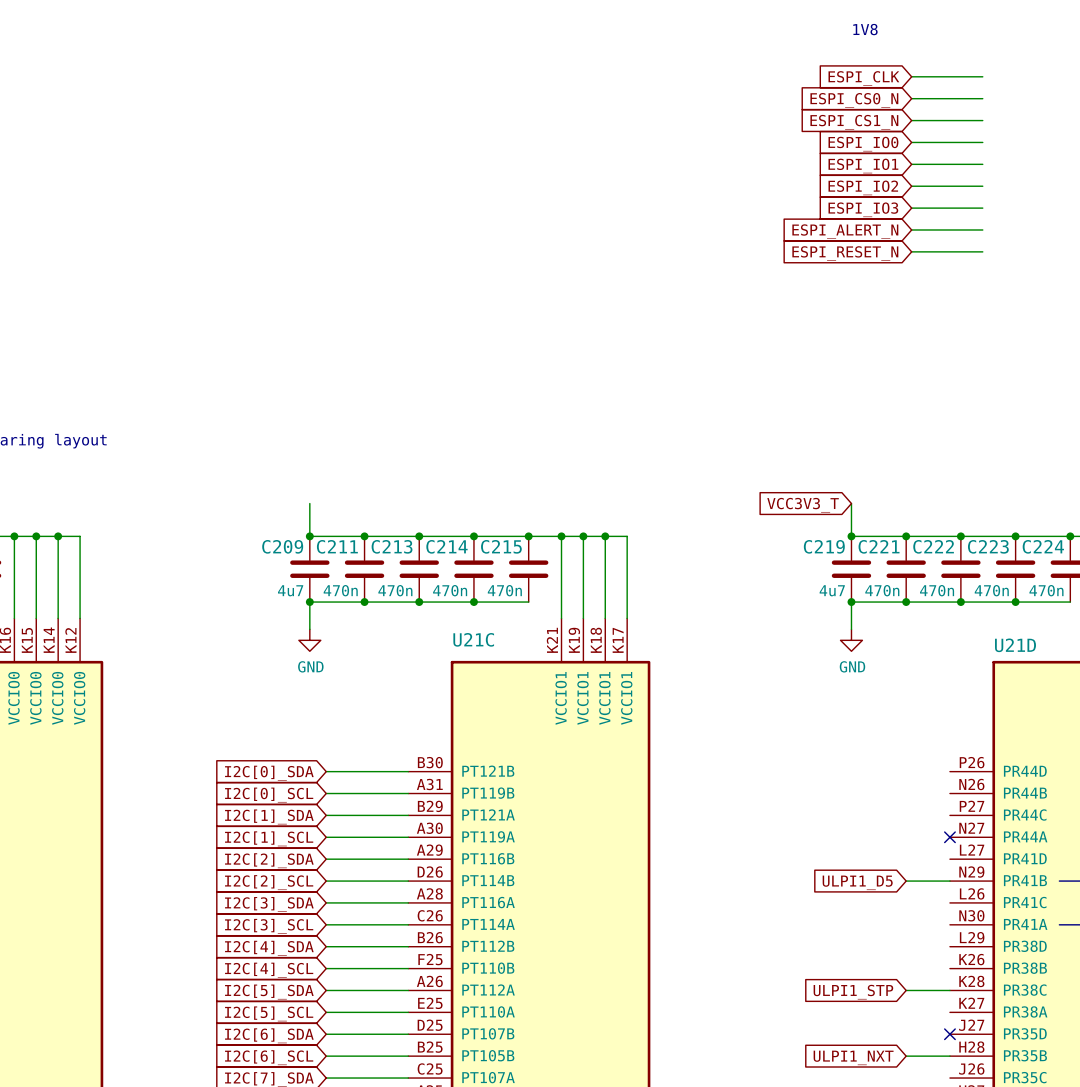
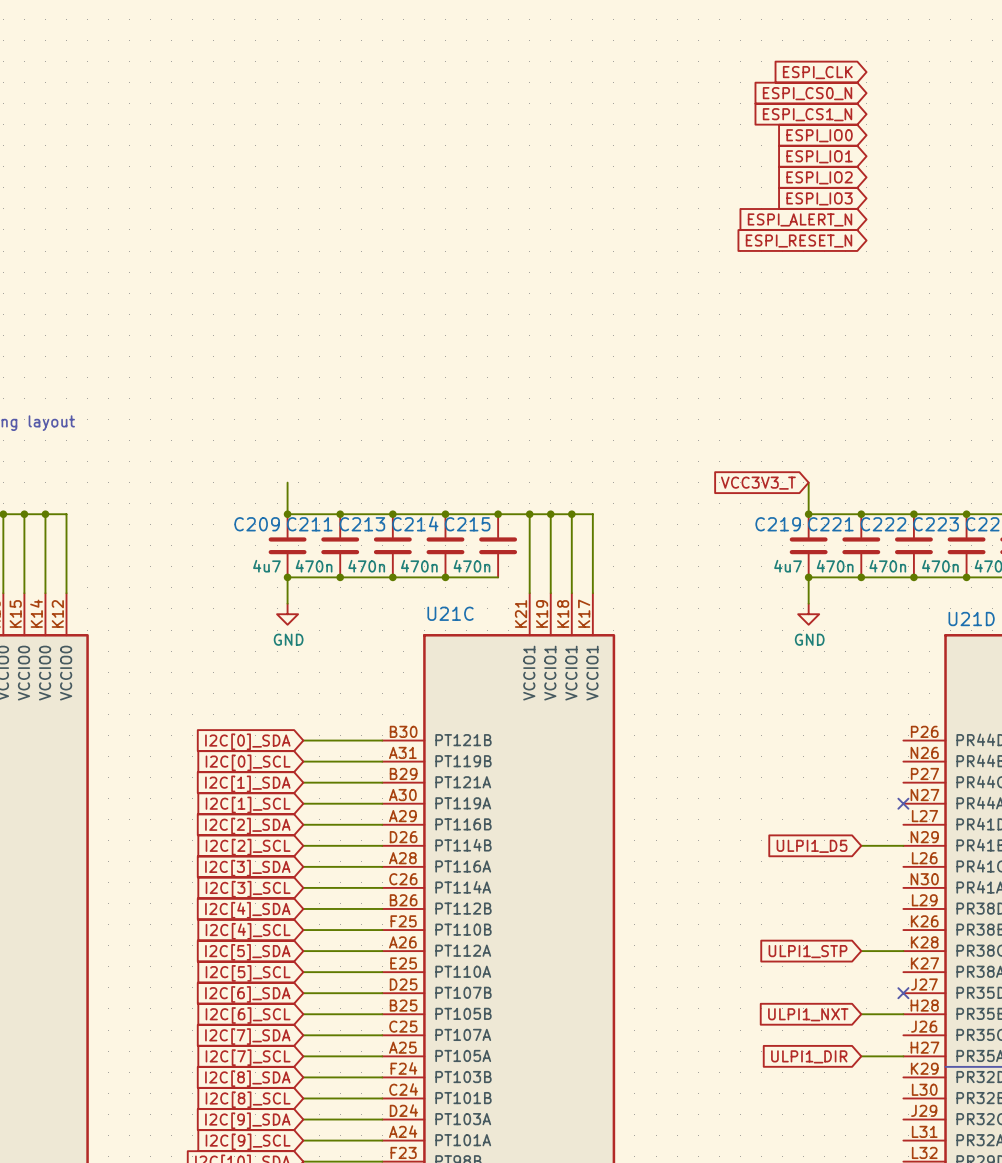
text: 1V8 (865, 29) -> none
wire: (911, 76) (982, 76) -> none
wire: (911, 98) (982, 98) -> none
wire: (911, 120) (982, 120) -> none
wire: (911, 142) (982, 142) -> none
wire: (911, 164) (982, 164) -> none
wire: (911, 186) (982, 186) -> none
wire: (911, 208) (982, 208) -> none
wire: (911, 229) (982, 229) -> none
wire: (911, 251) (982, 251) -> none

